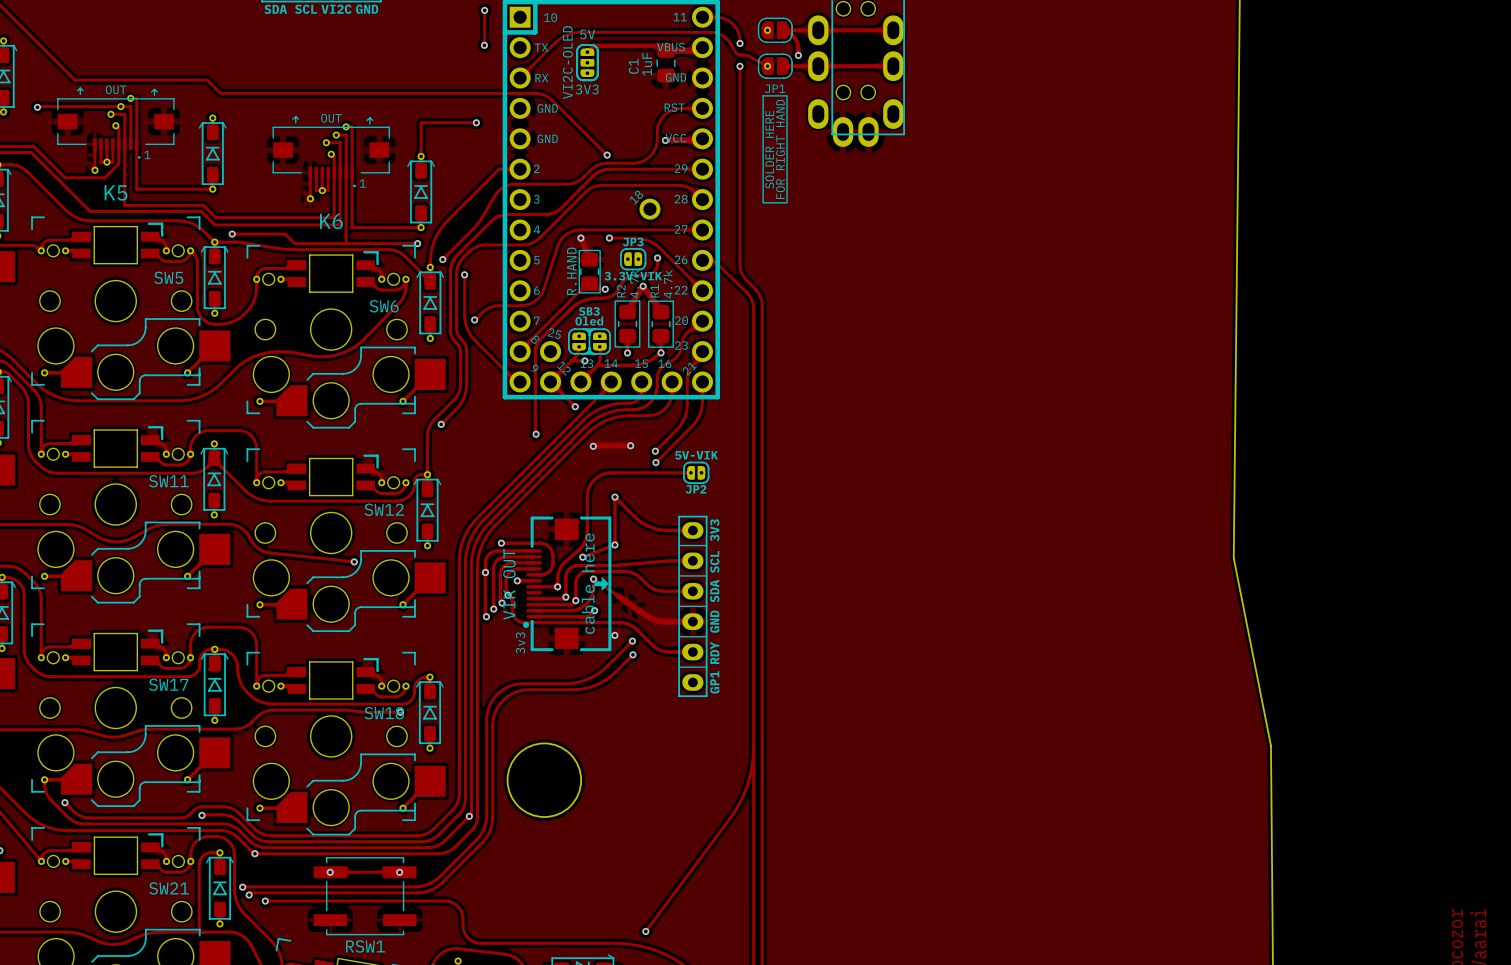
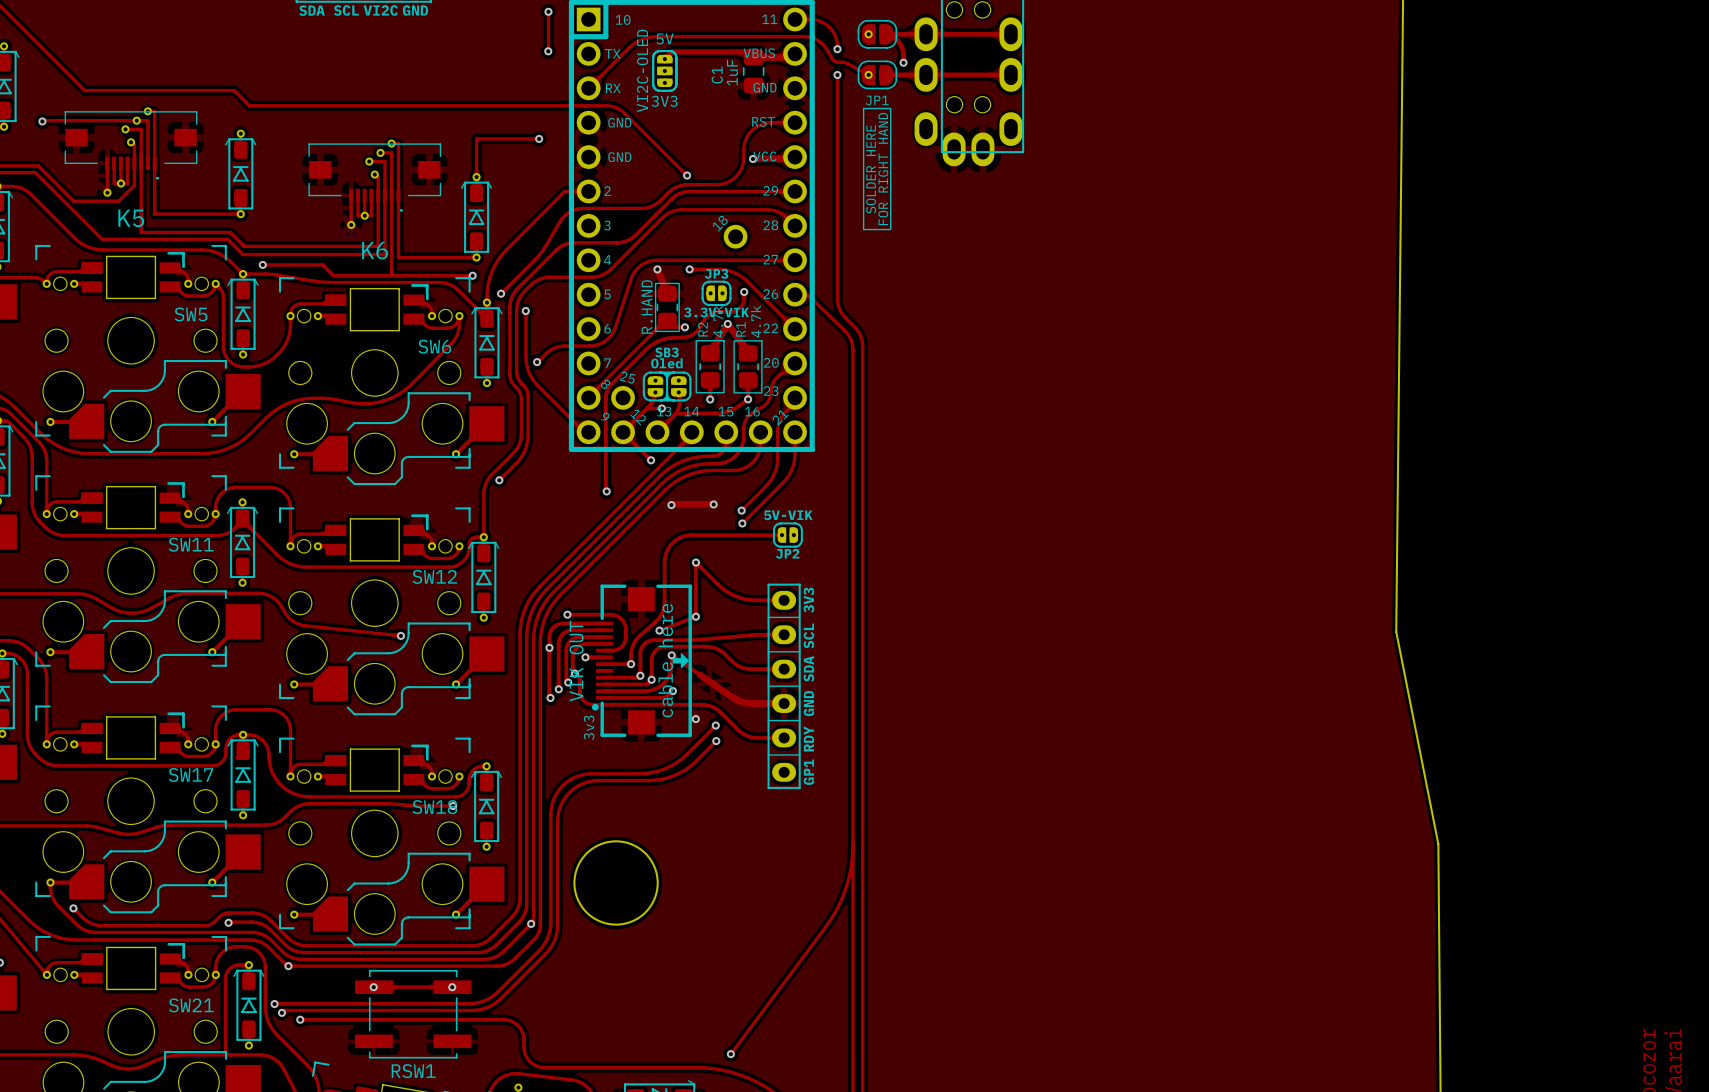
K5 footprint: [57, 87, 175, 174] -> [64, 107, 198, 197]
K6 footprint: [272, 116, 390, 203] -> [308, 139, 442, 230]

